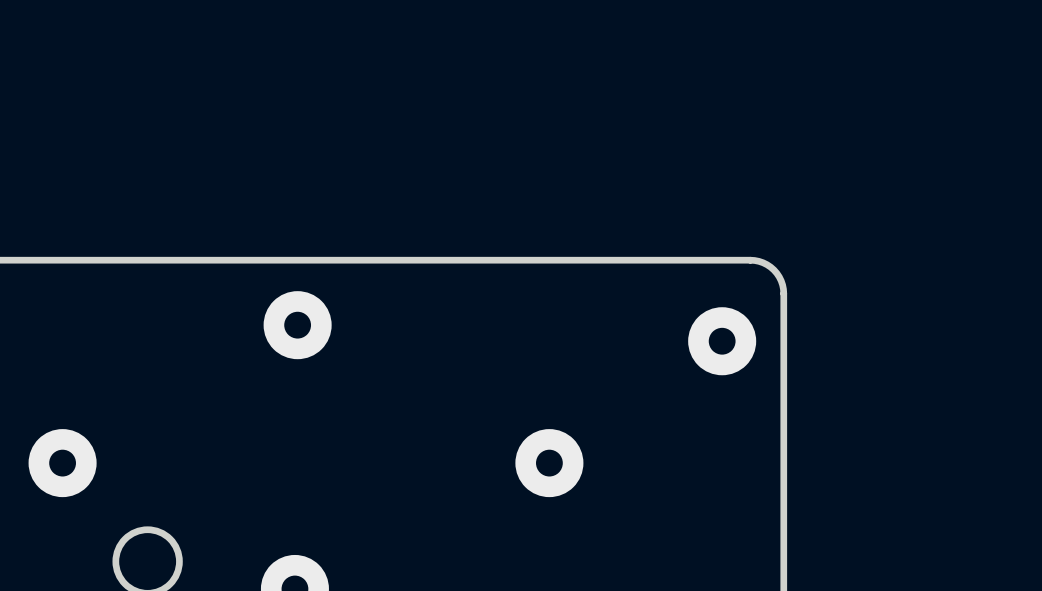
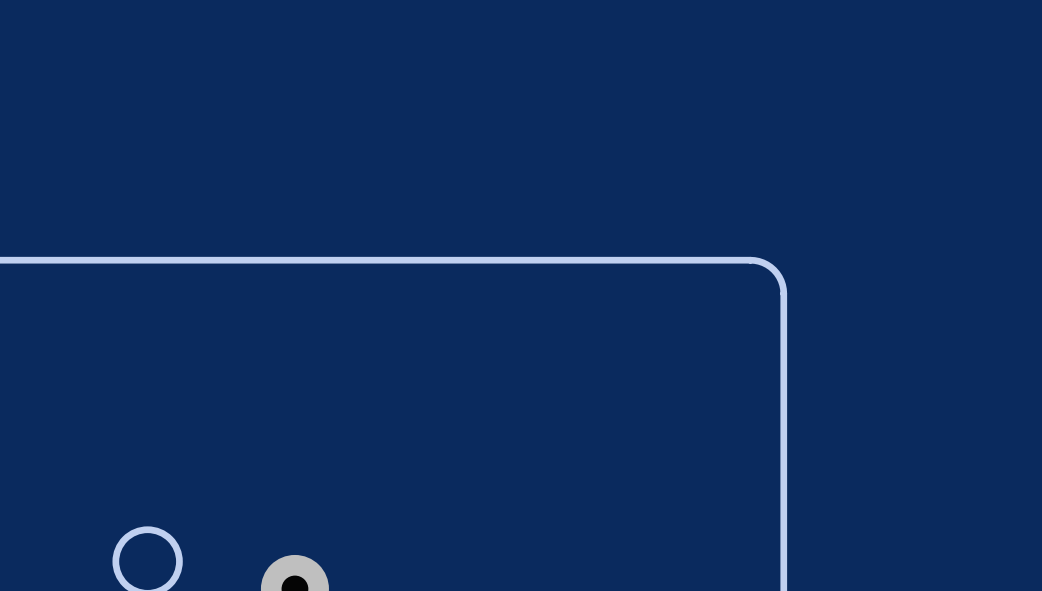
via: (297, 325) -> none
via: (722, 341) -> none
via: (62, 463) -> none
via: (549, 463) -> none

